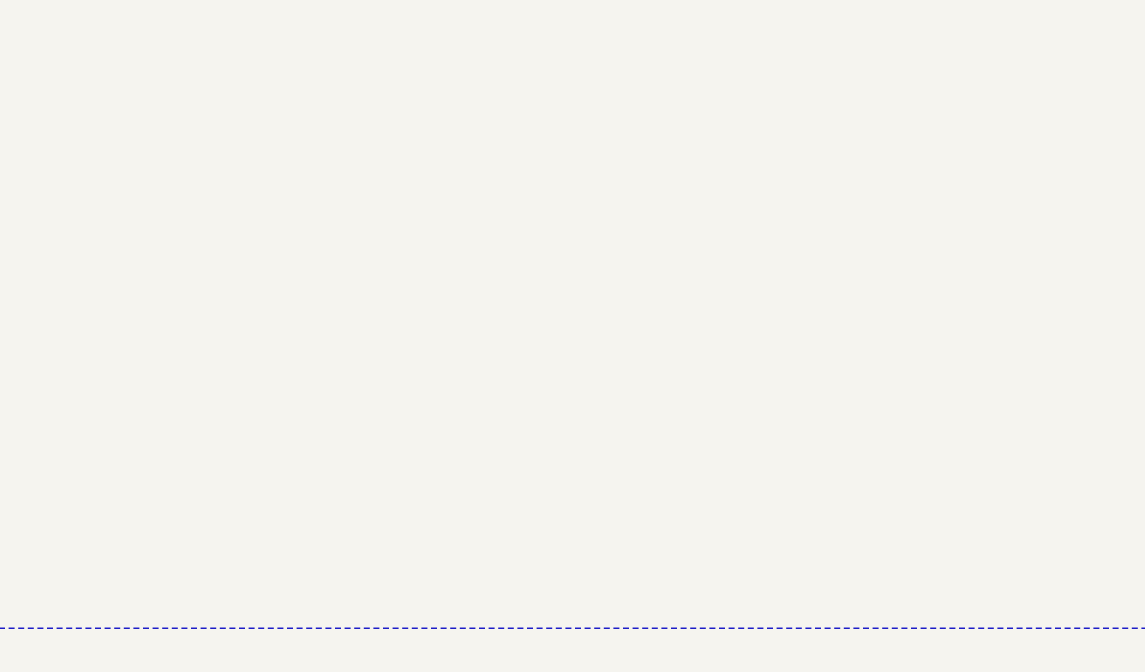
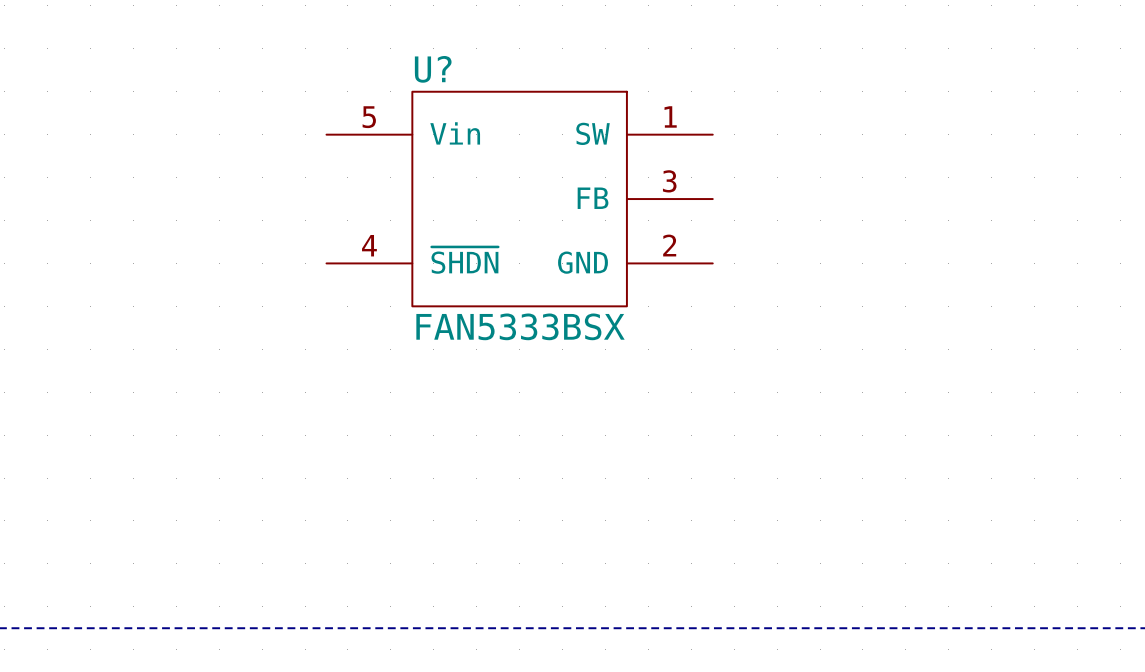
U?: none -> FAN5333BSX (519, 199)

